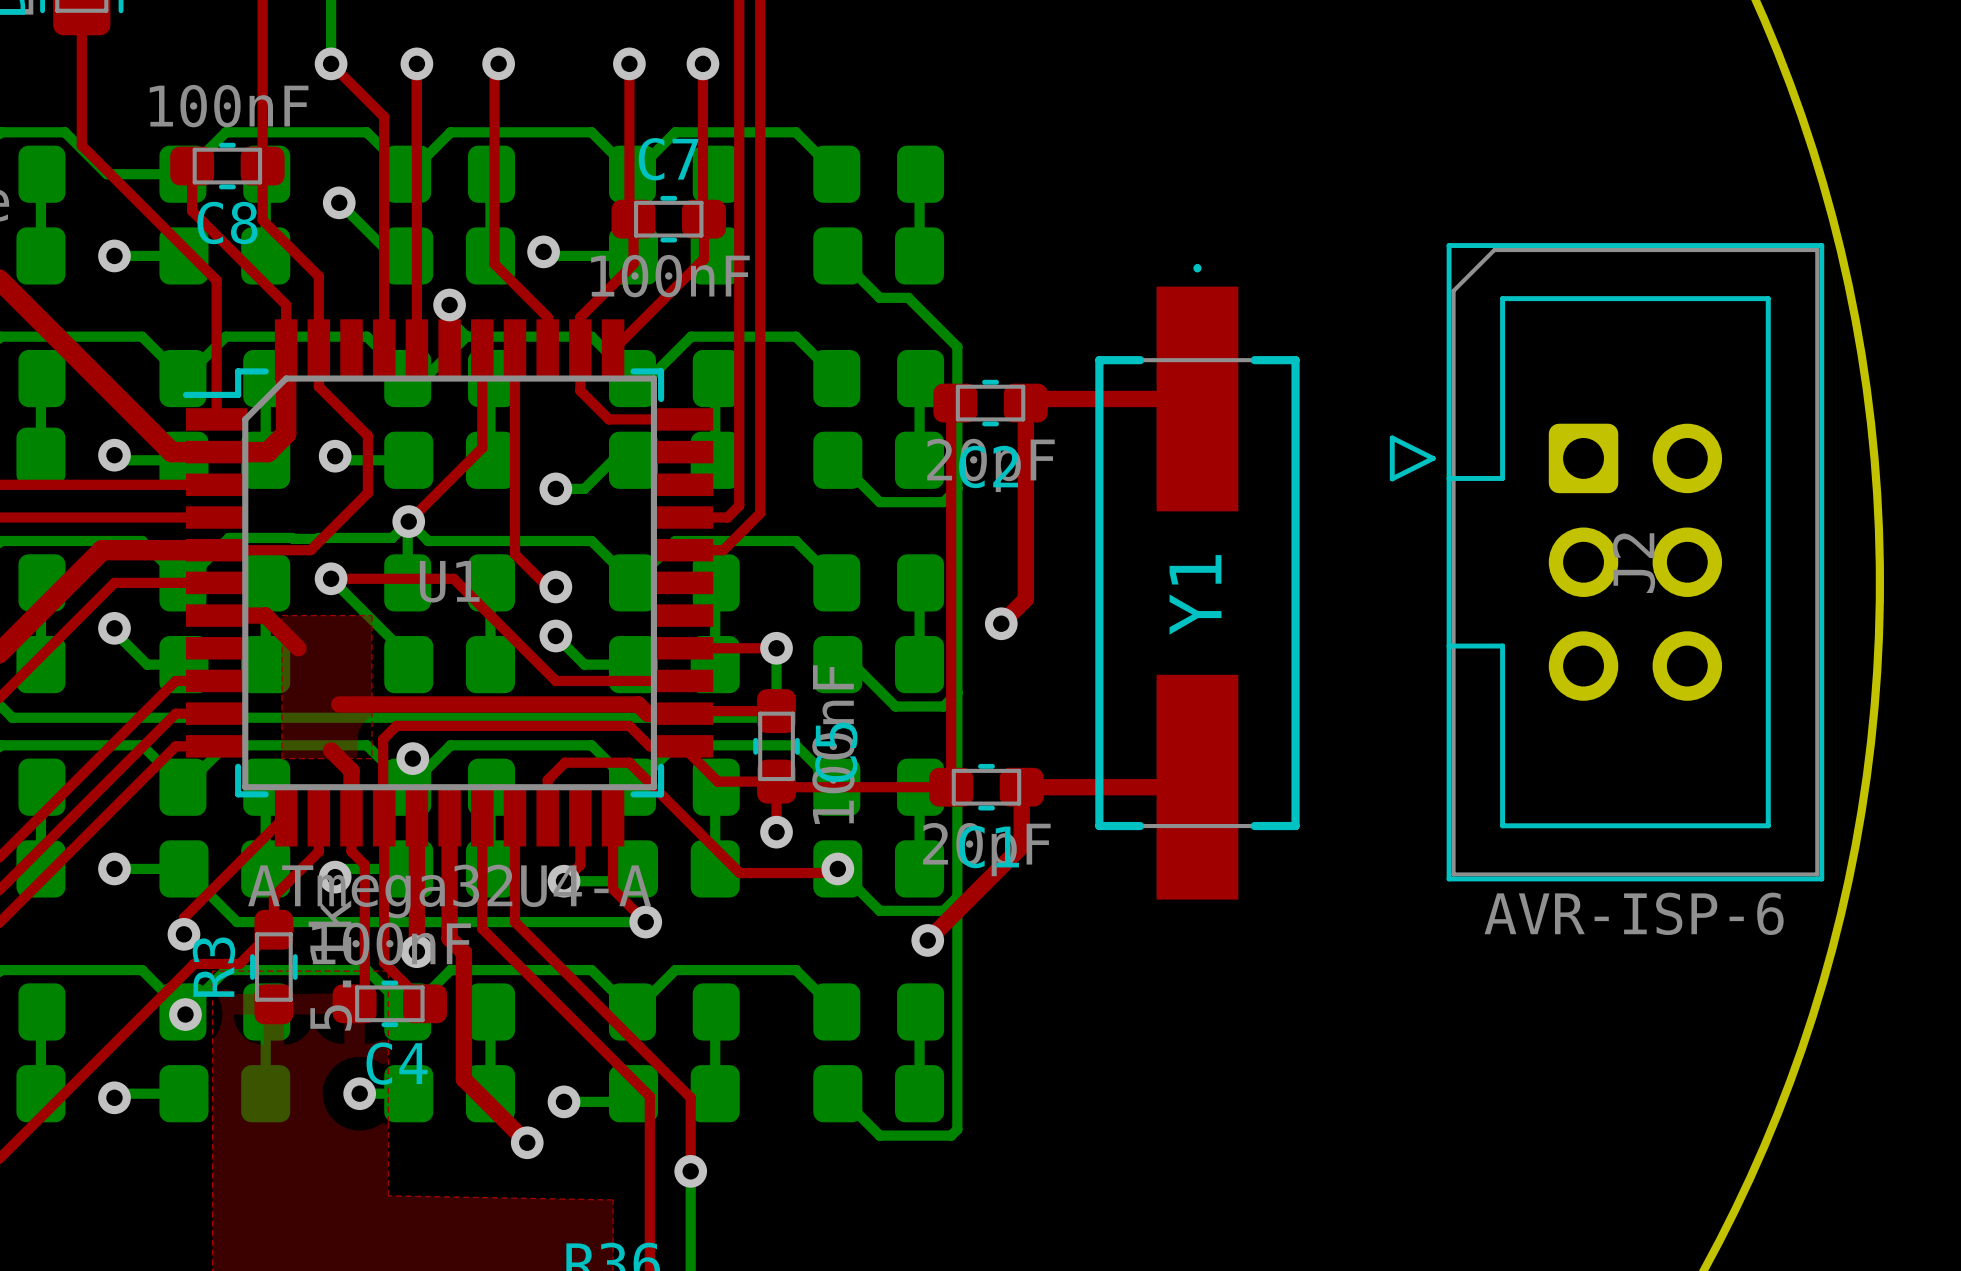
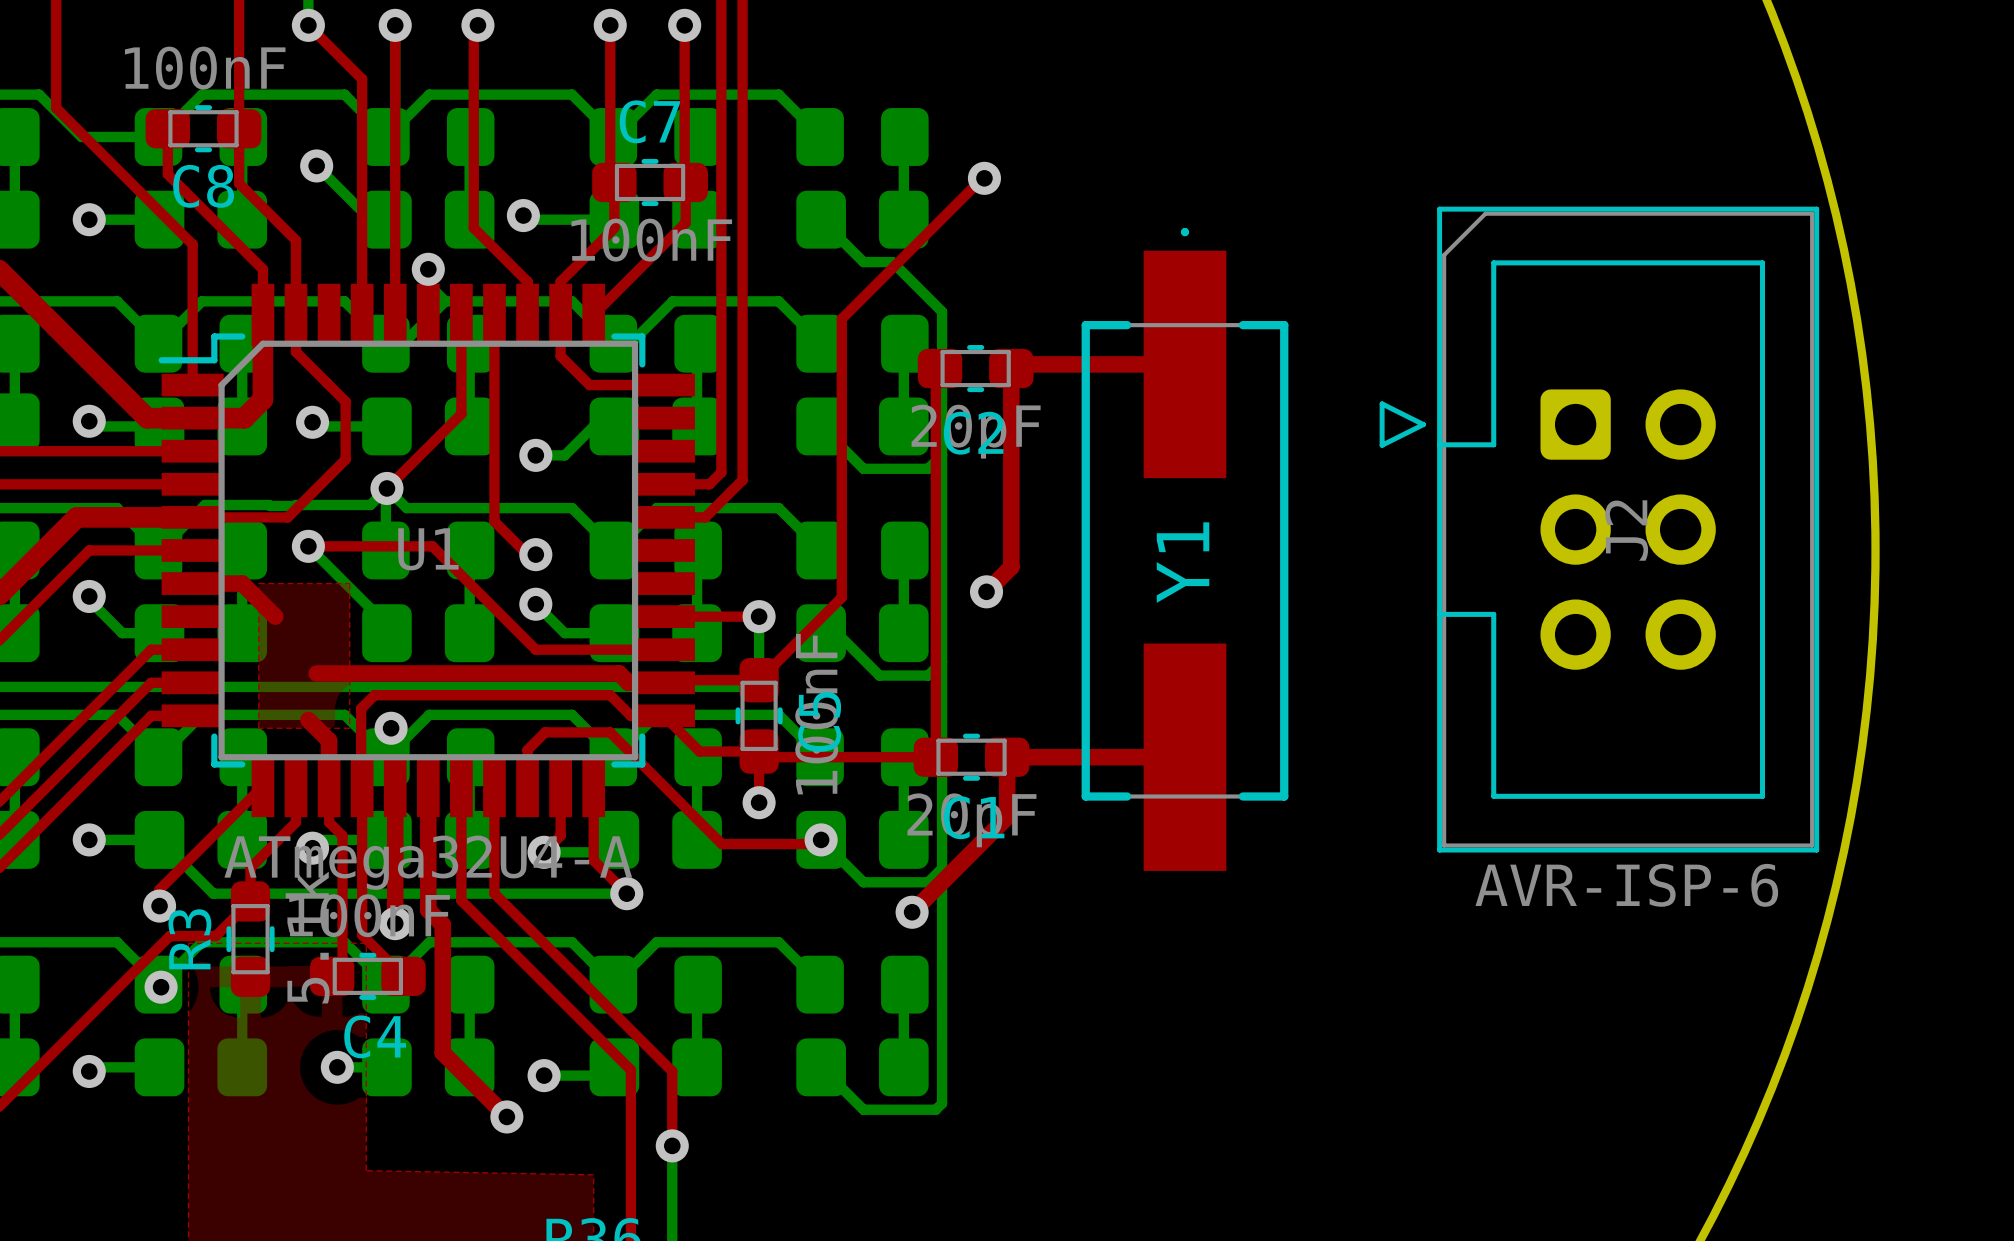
top track: none -> (984, 178) (841, 318) (841, 597) (759, 680)
via: none -> (984, 178)

